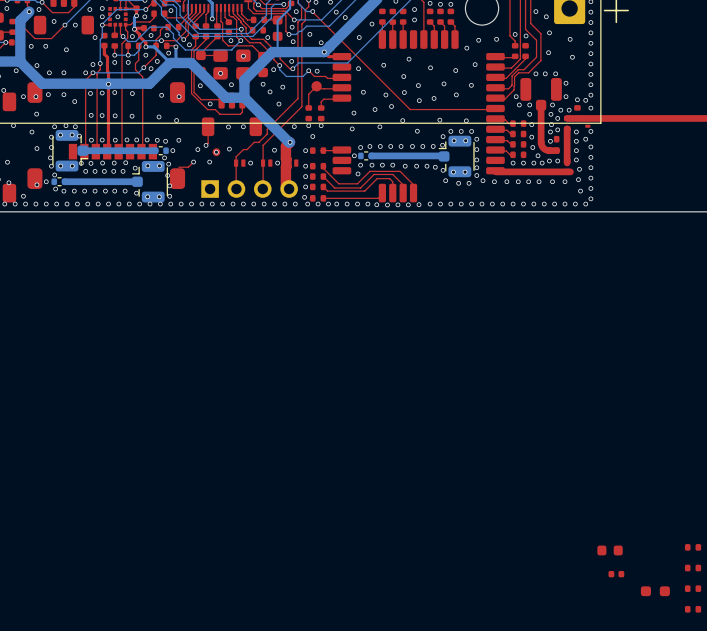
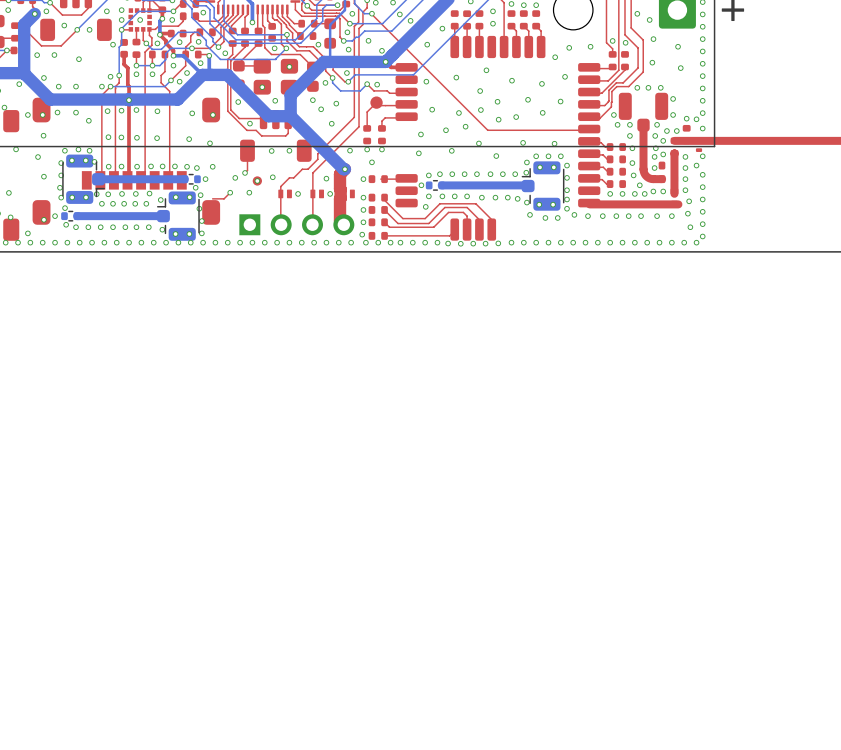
part: (693, 547) -> none
part: (610, 550) -> none
part: (693, 568) -> none
part: (616, 574) -> none
part: (693, 588) -> none
part: (655, 591) -> none
part: (693, 609) -> none

